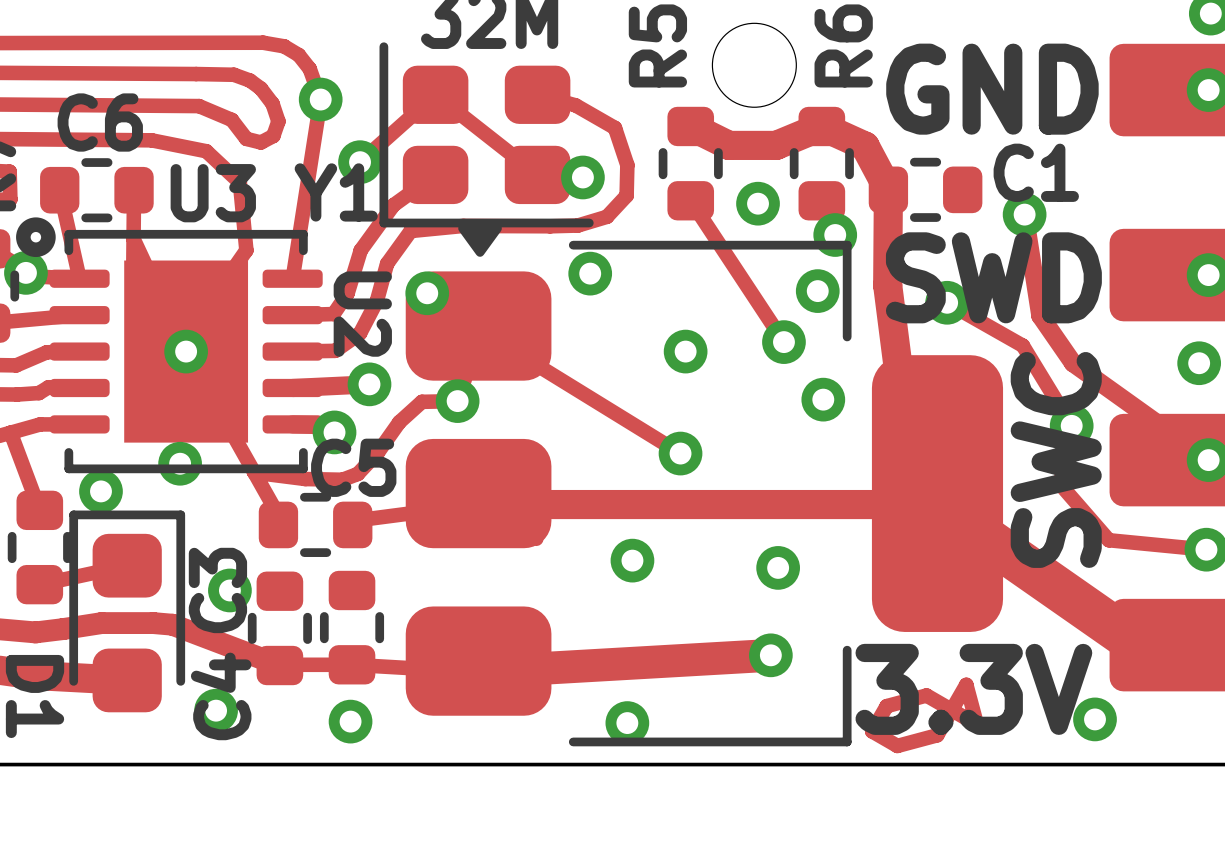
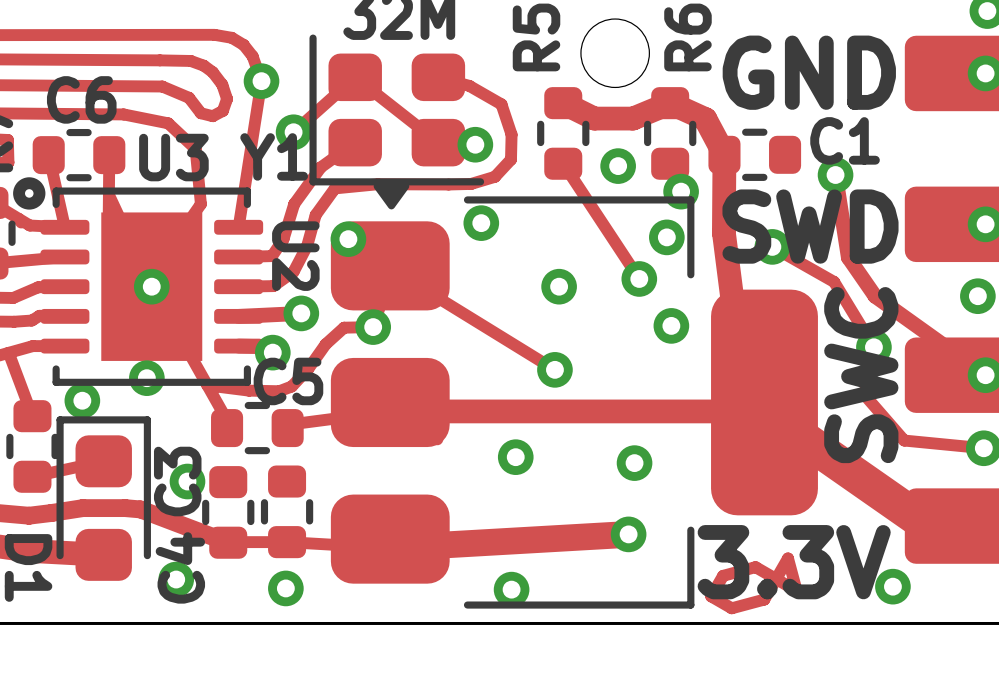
via: (25, 272) -> none

